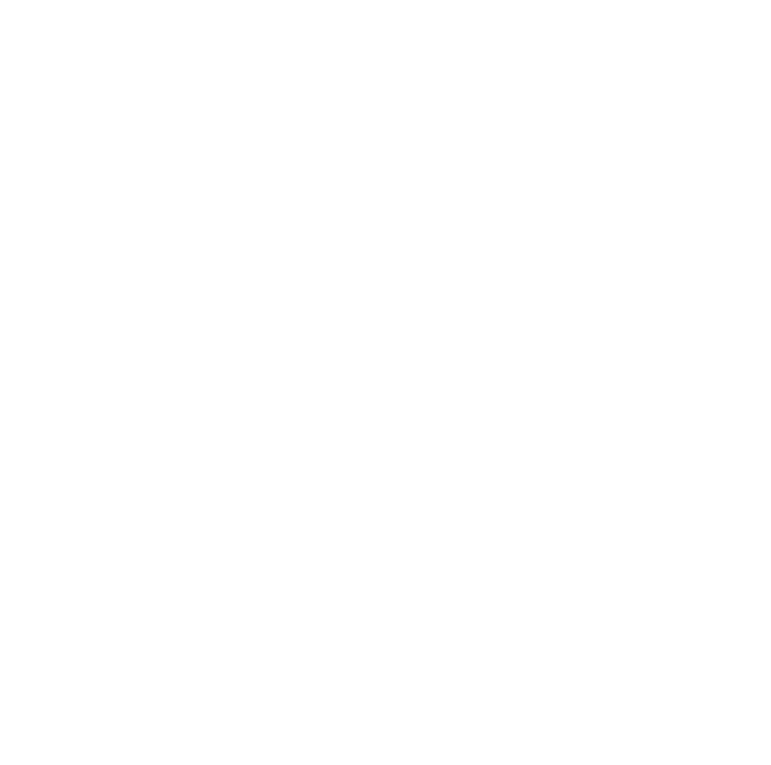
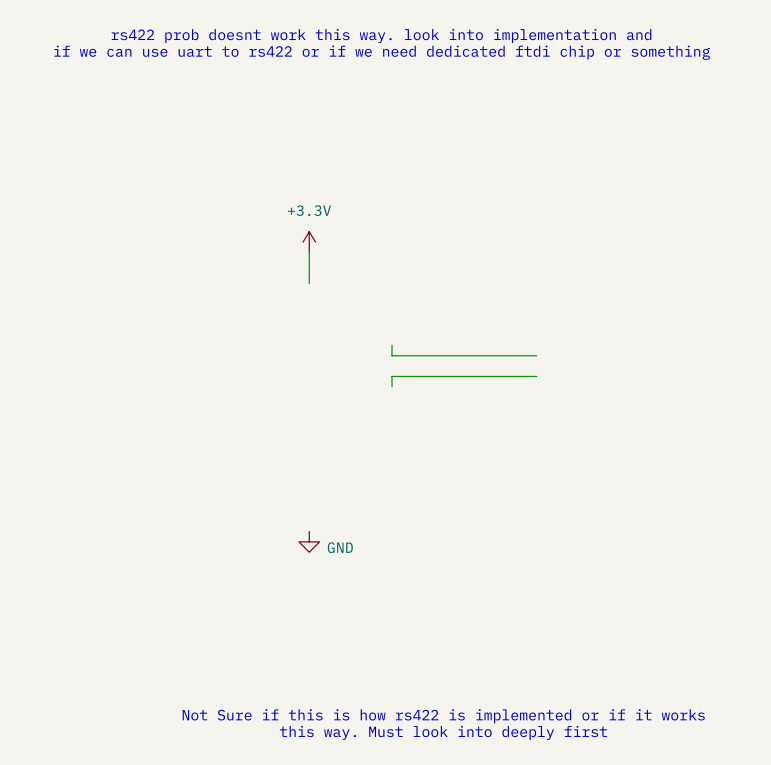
text: none -> rs422 prob doesnt work this way. look into implementation and (381, 35)
text: none -> if we can use uart to rs422 or if we need dedicated ftdi chip or something (382, 52)
power symbol: none -> +3.3V (309, 242)
wire: none -> (309, 252) (309, 283)
wire: none -> (392, 345) (392, 355) (536, 355)
wire: none -> (536, 376) (392, 376) (392, 386)
power symbol: none -> GND (309, 541)
text: none -> Not Sure if this is how rs422 is implemented or if it works (443, 716)
text: none -> this way. Must look into deeply first (443, 732)

